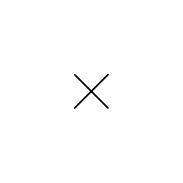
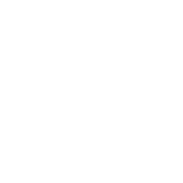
no-connect mark: (91, 91) -> none

